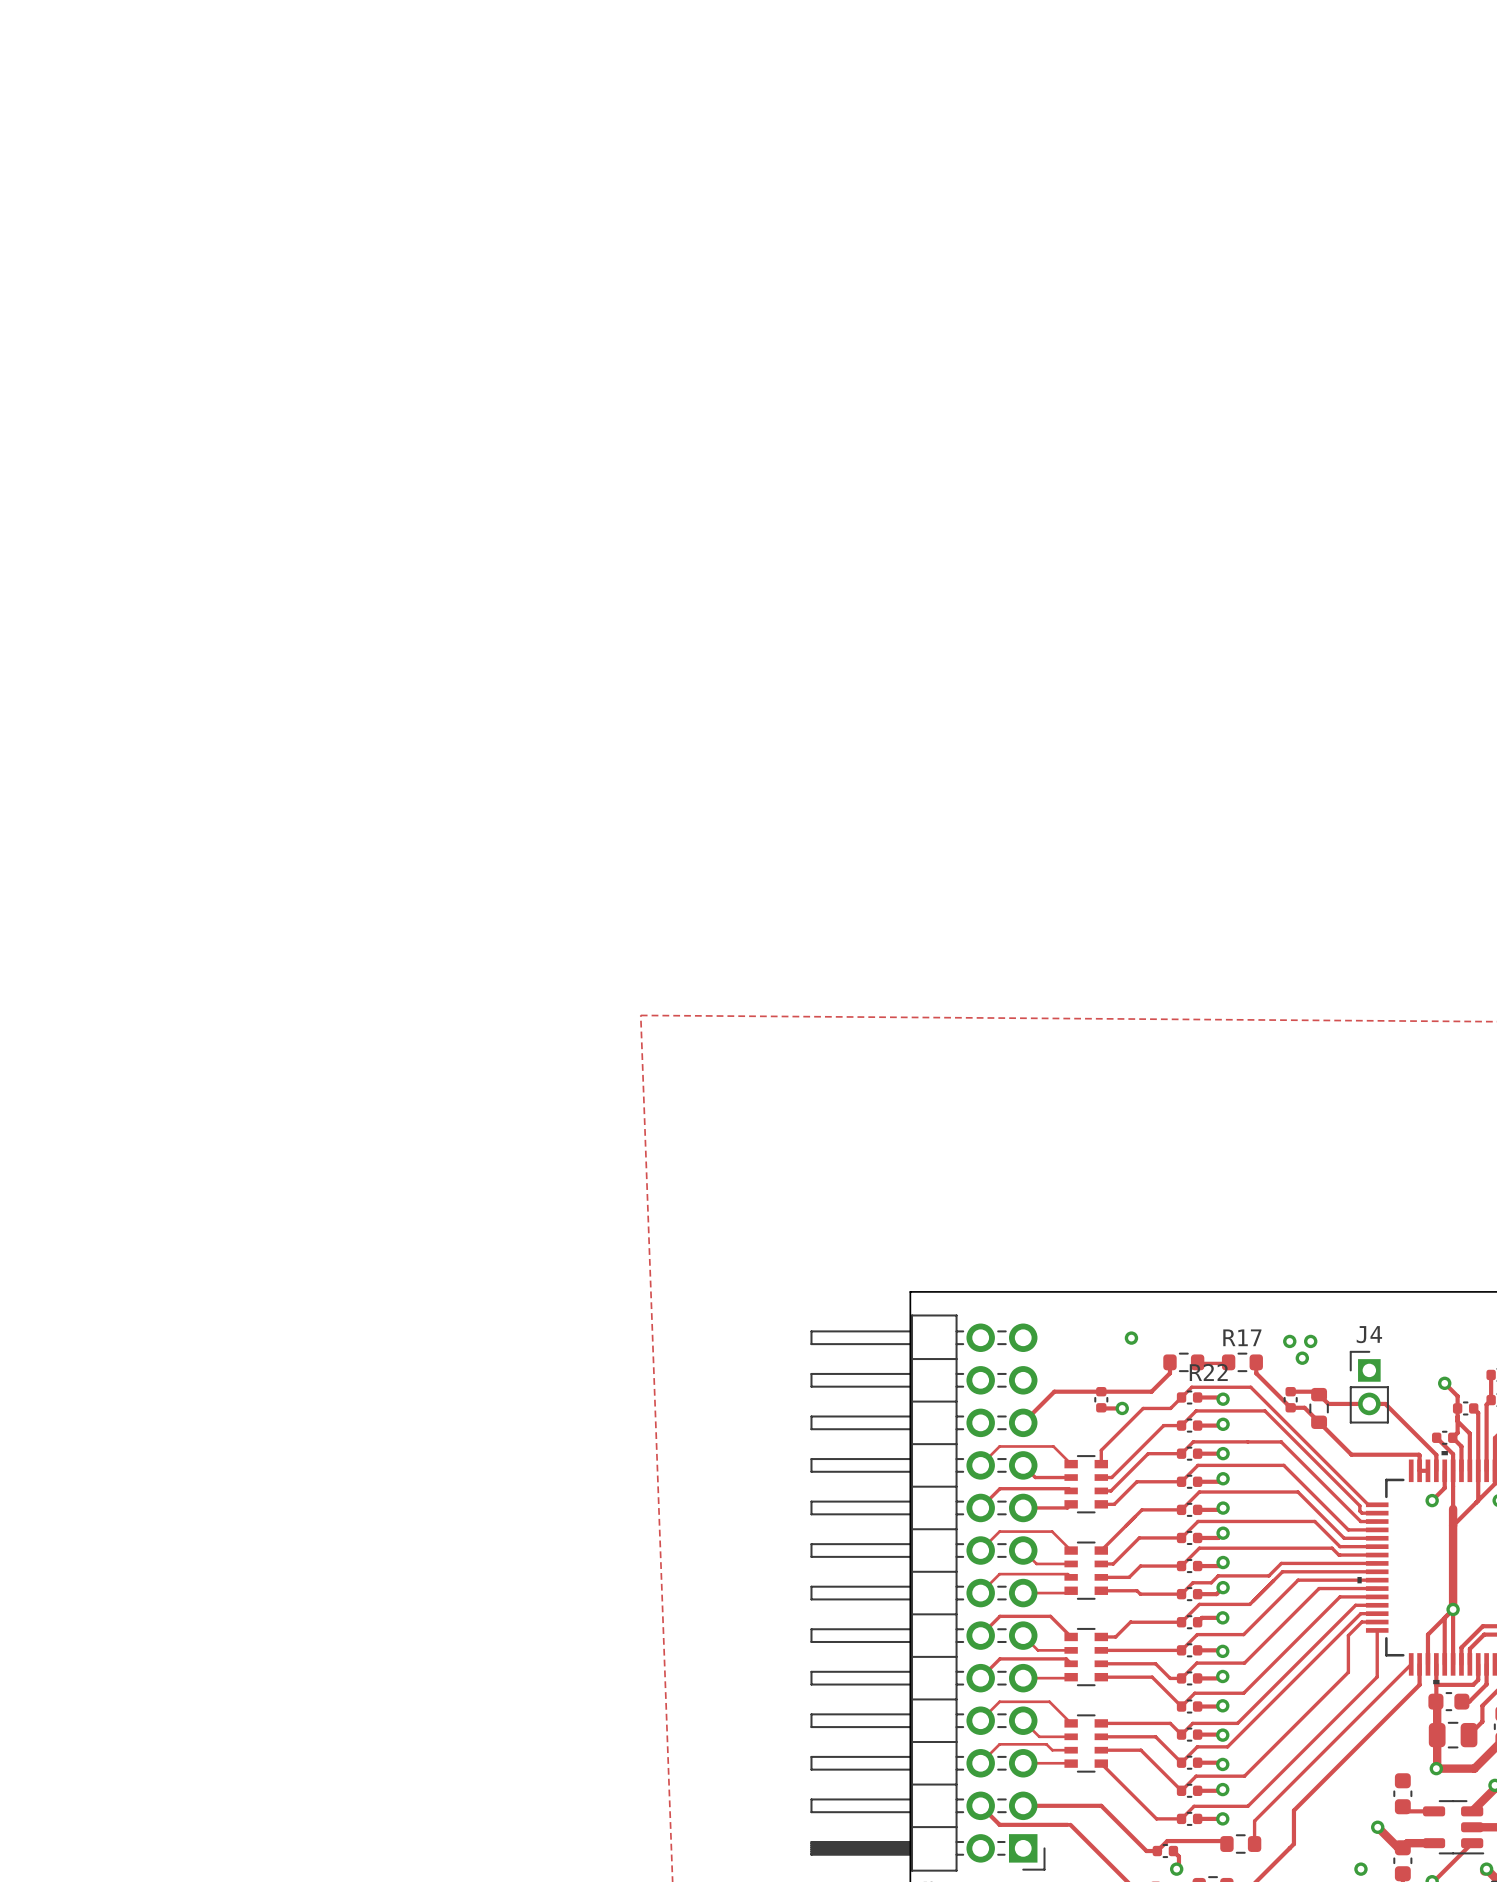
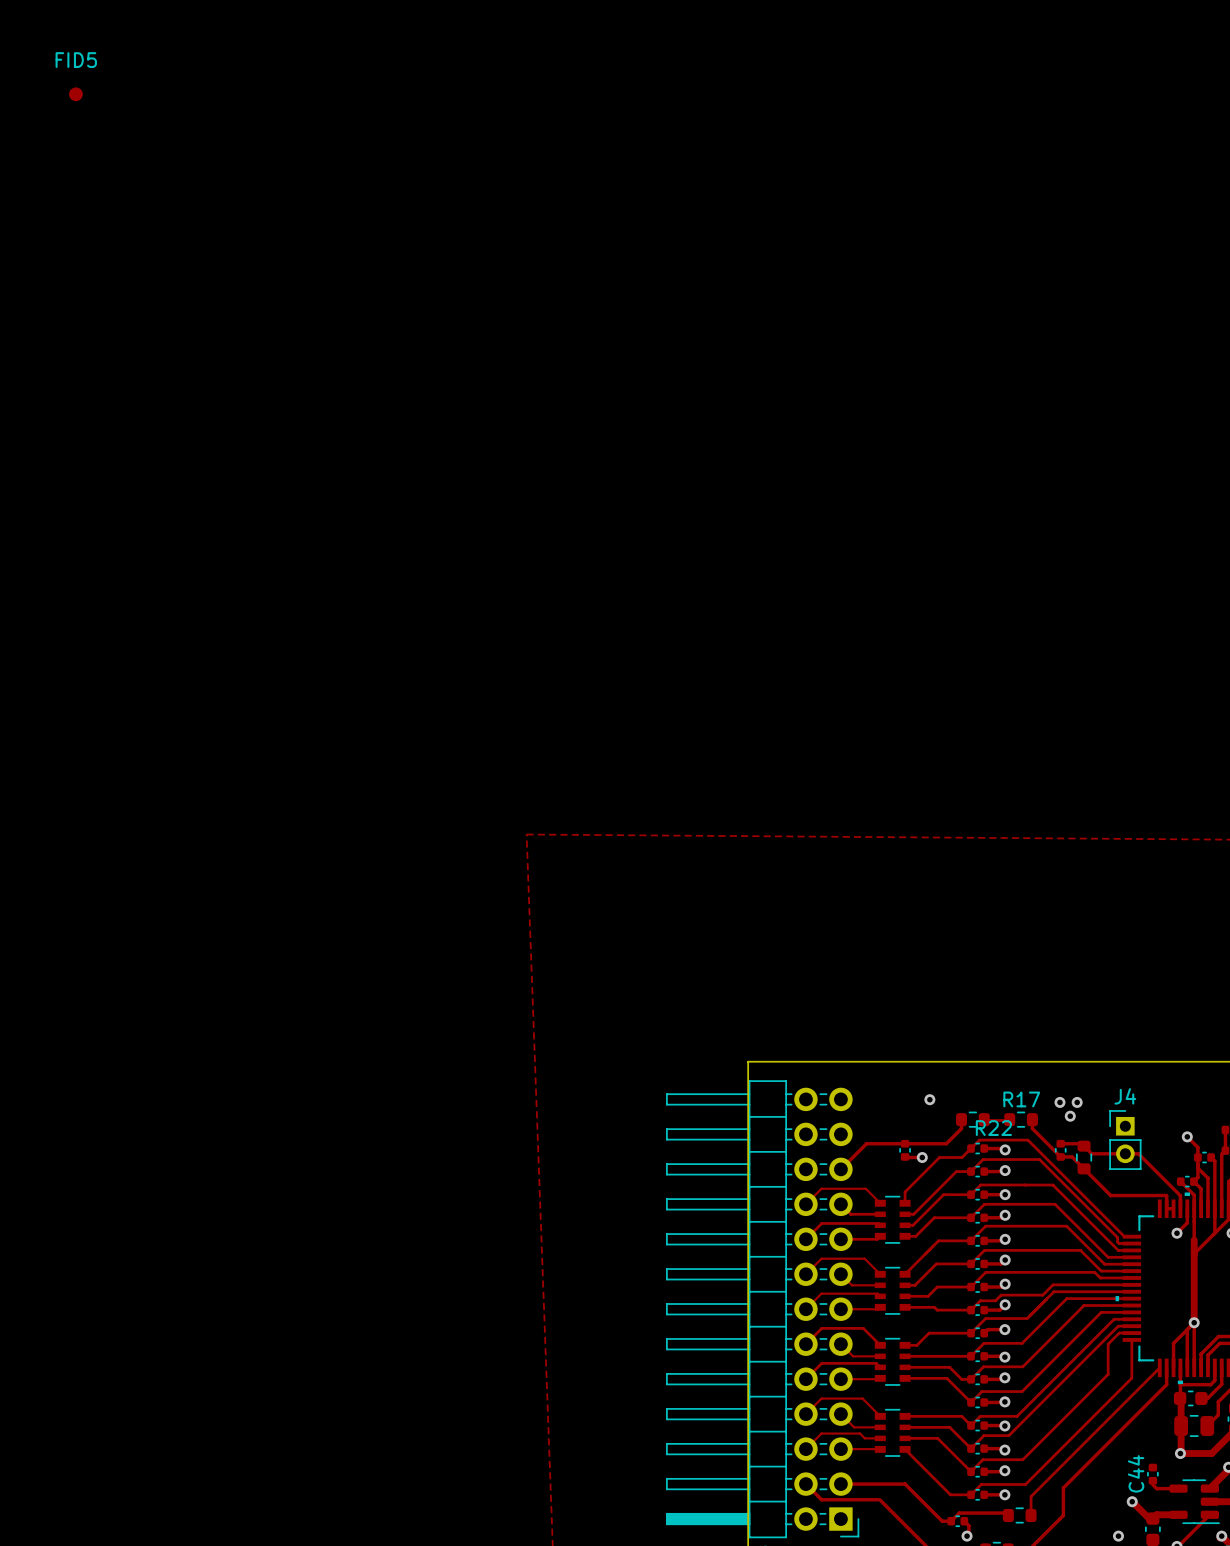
FID5: none -> (75, 94)
part: (1402, 1793) -> none
C44: none -> (1152, 1474)

